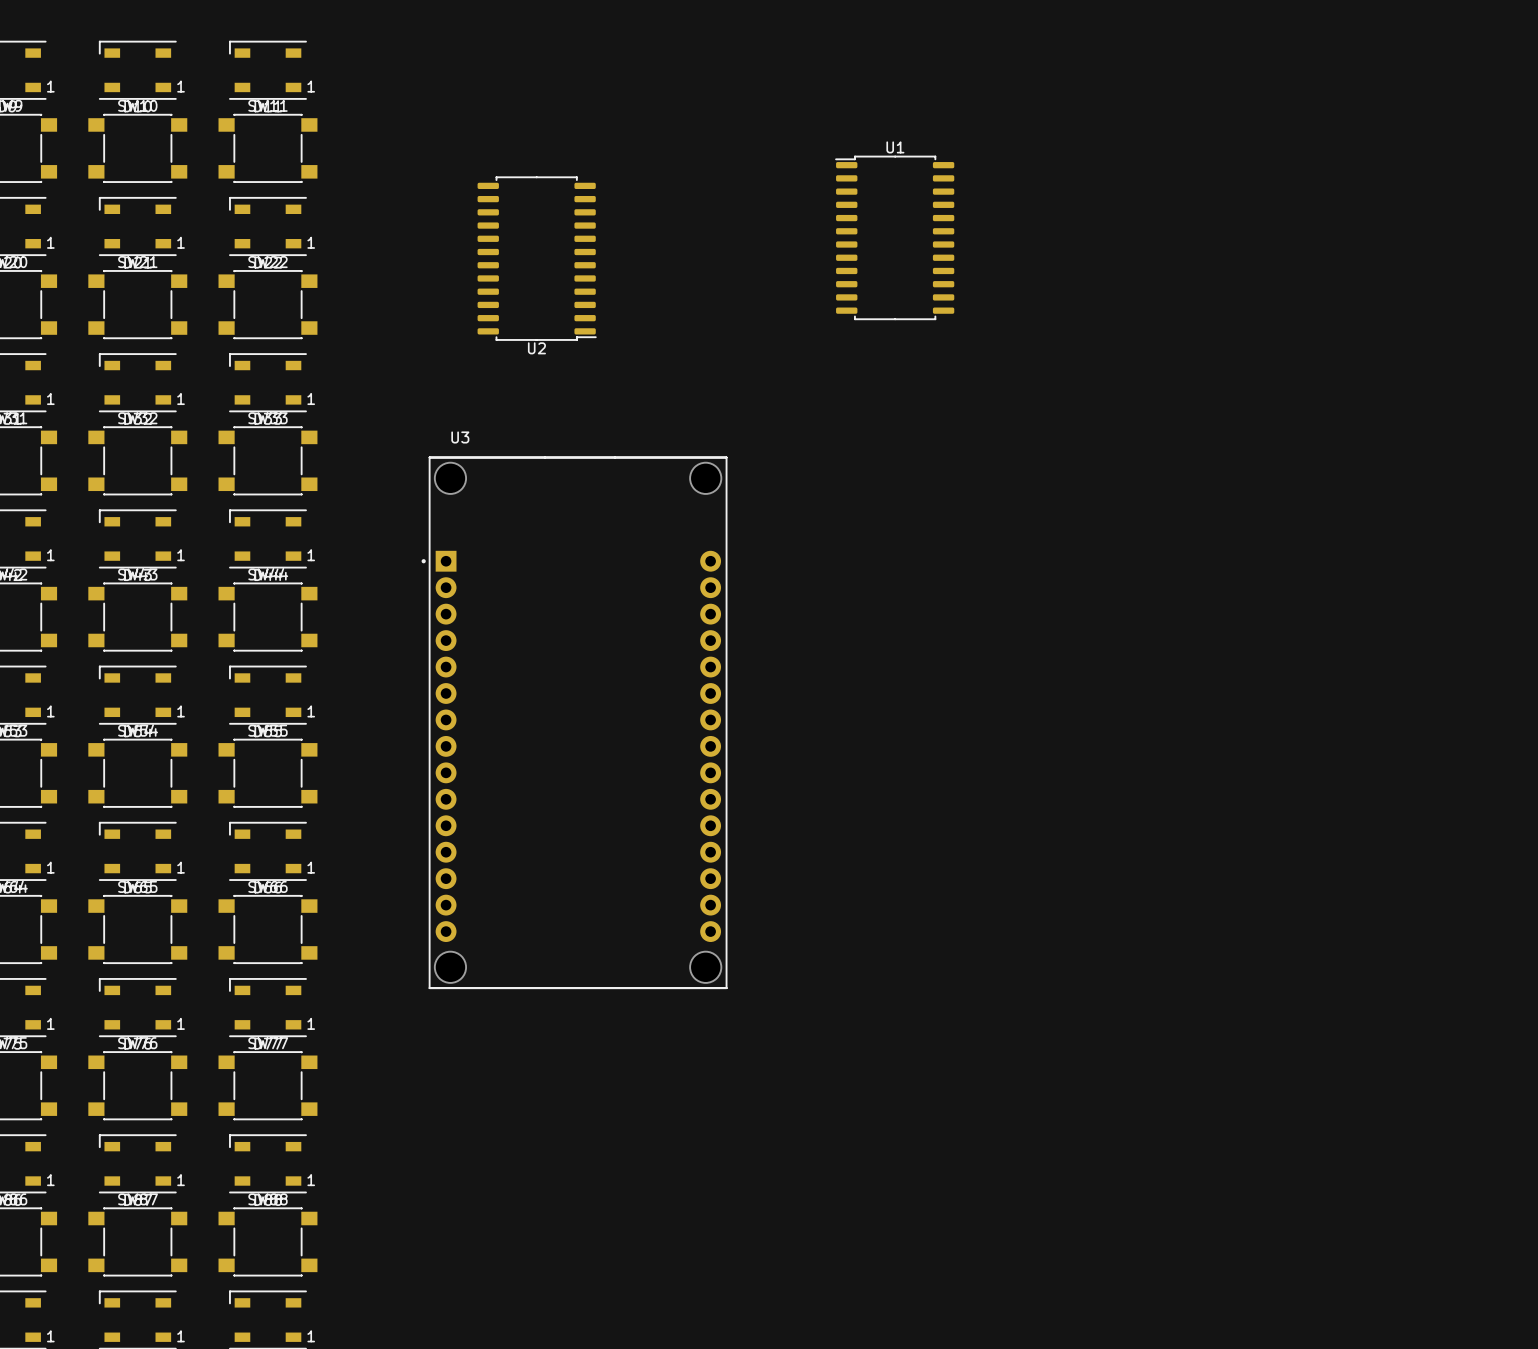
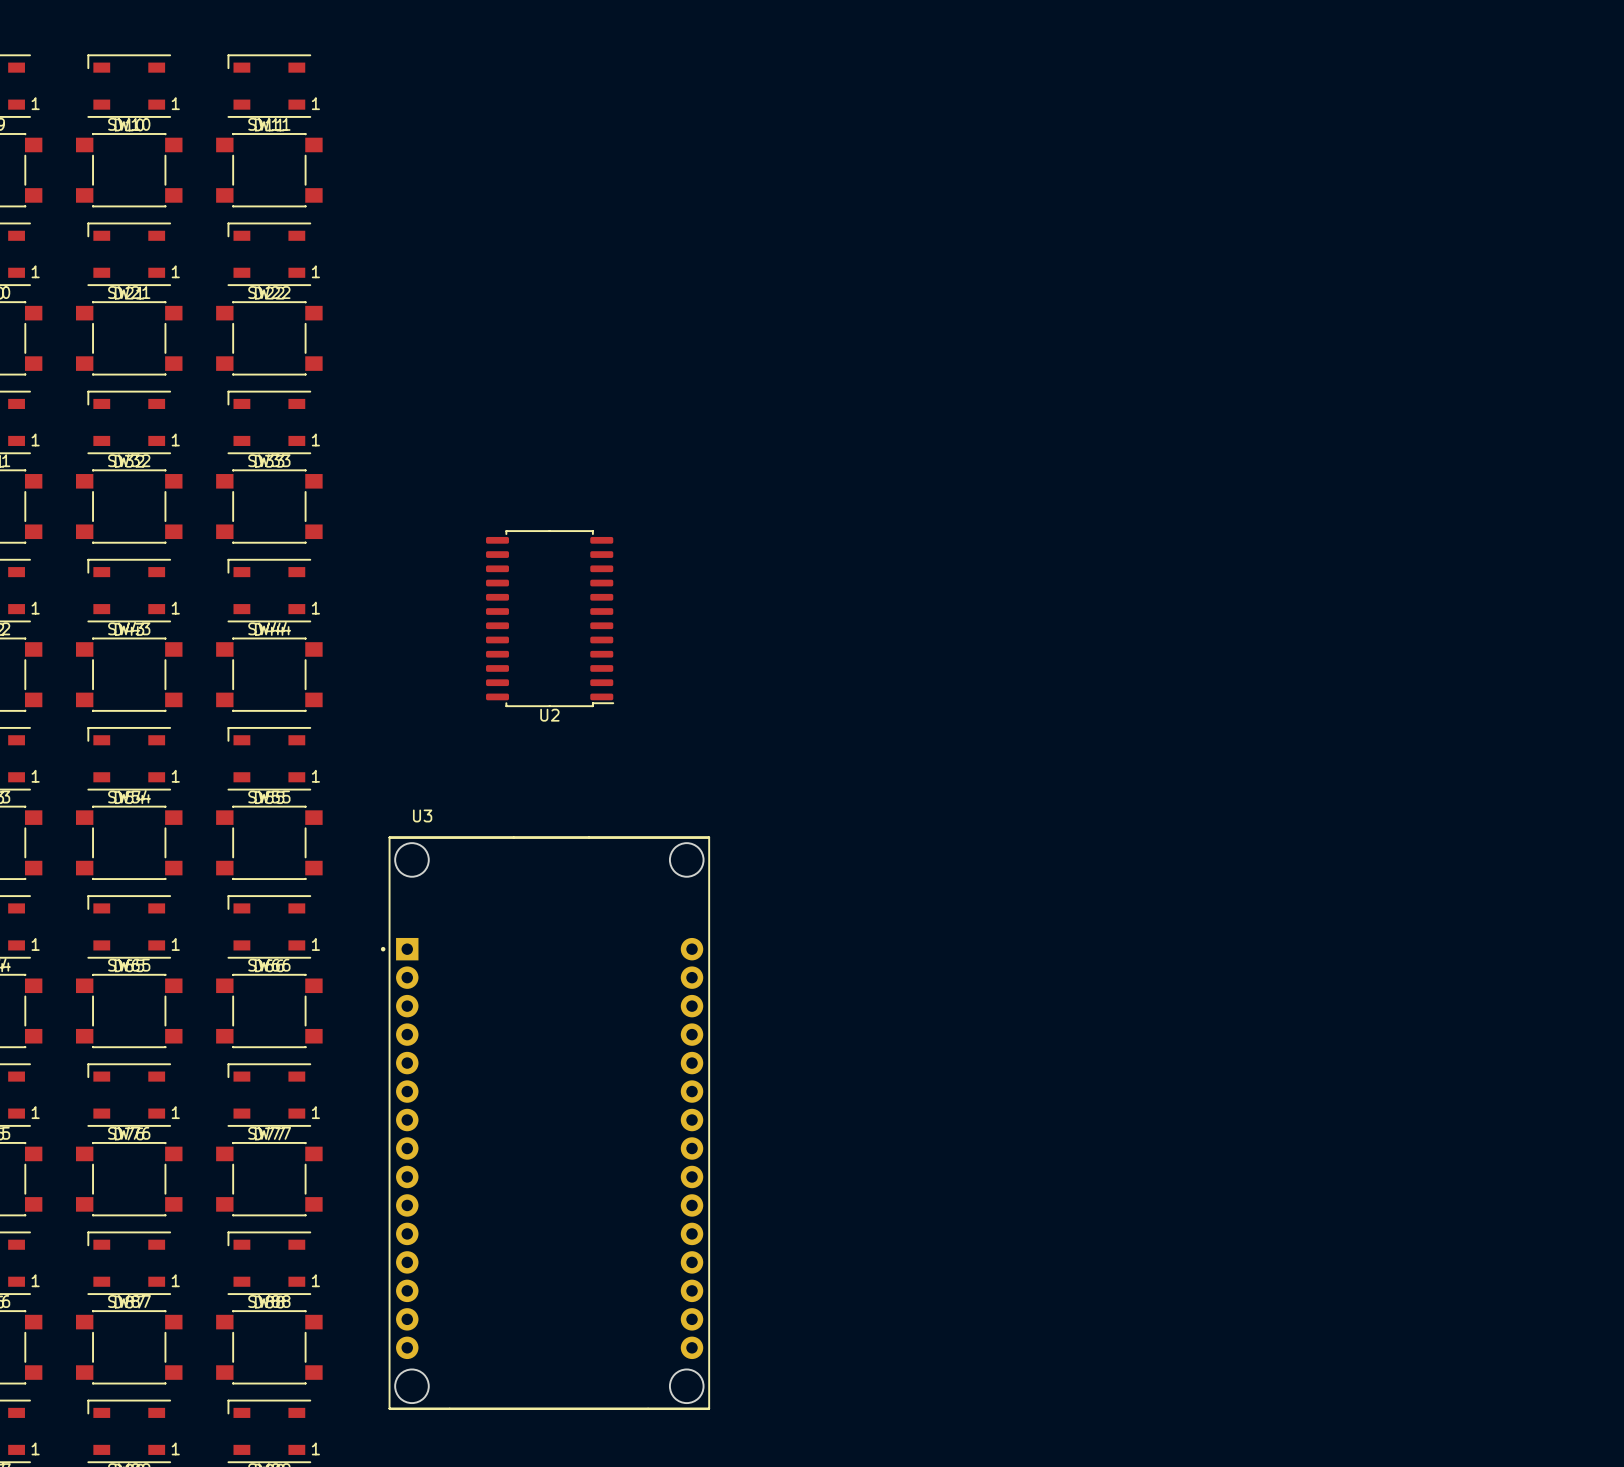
U1: (894, 237) -> none
U2 position: (536, 258) -> (549, 618)
U3 position: (574, 722) -> (545, 1123)

